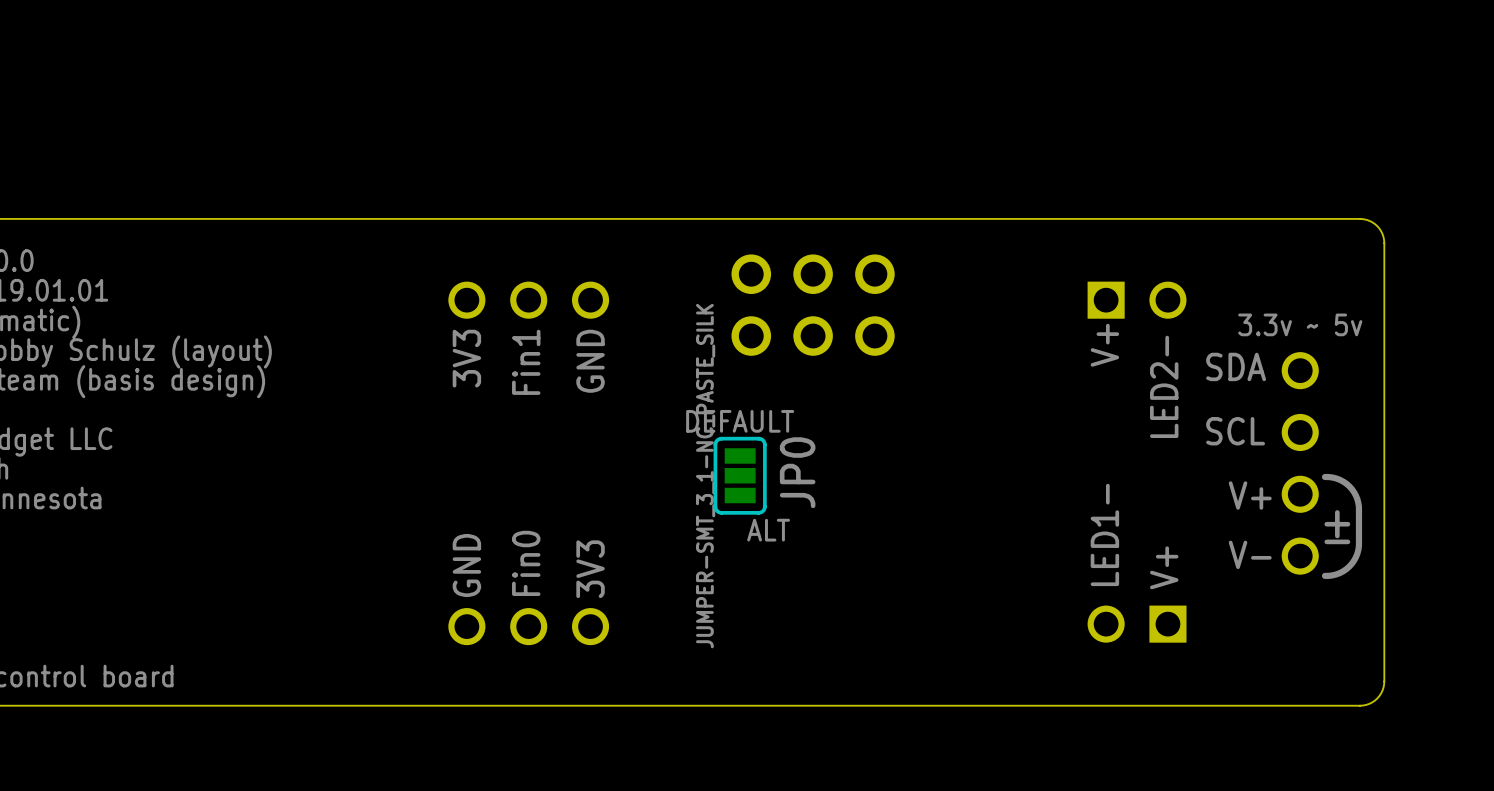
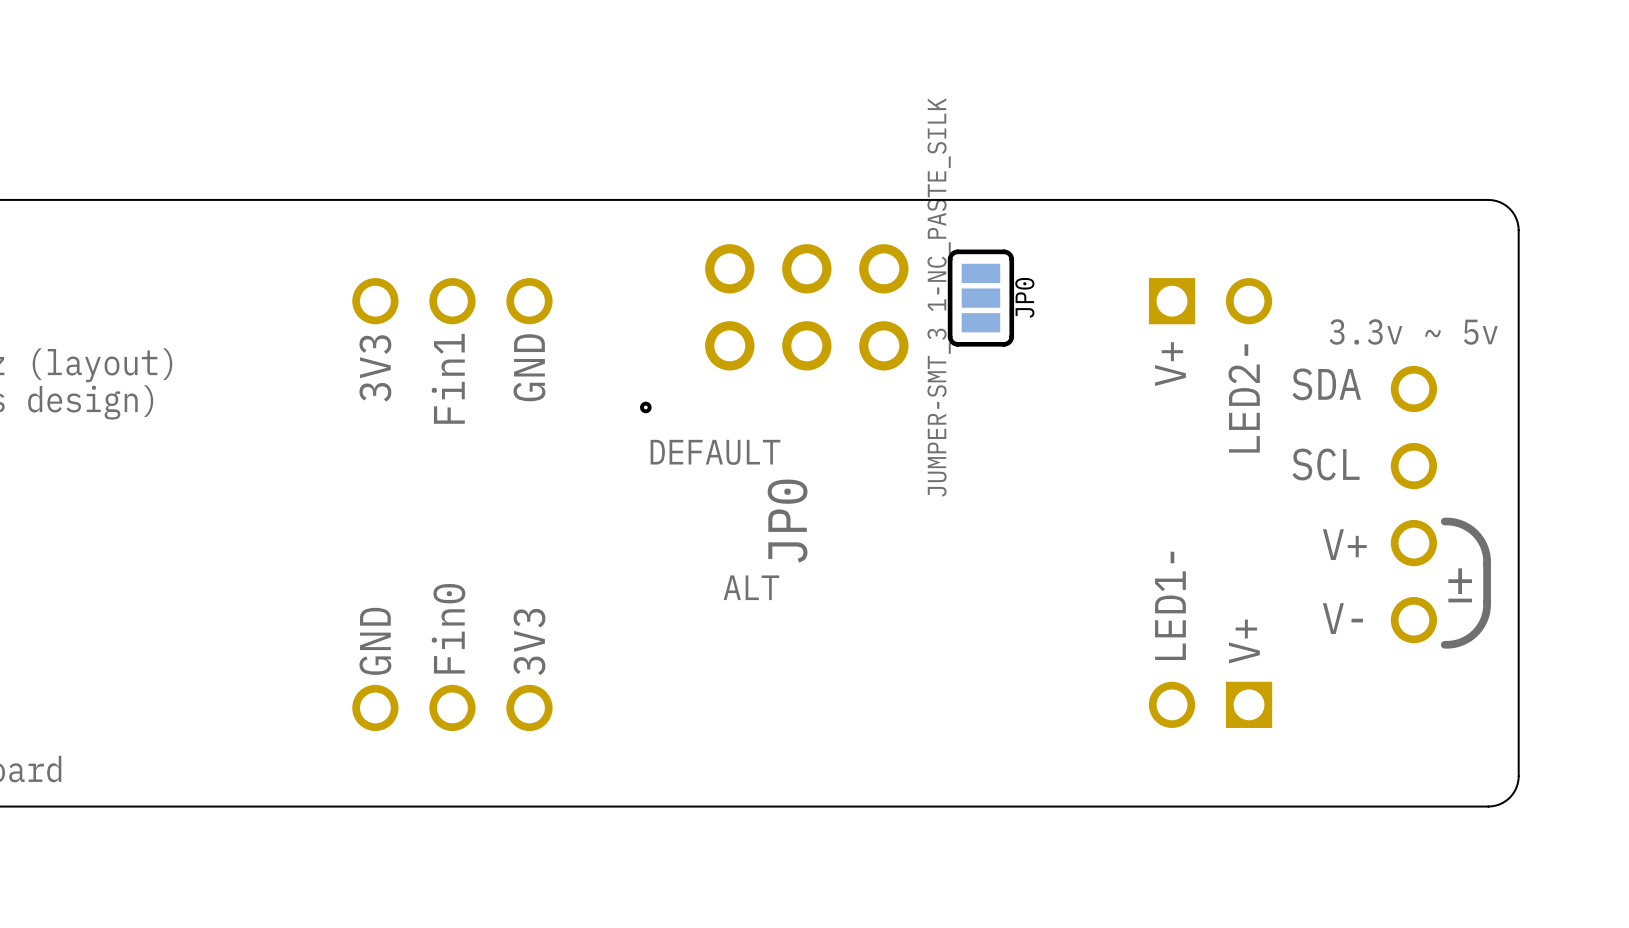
JP0: none -> JUMPER-SMT_3_1-NC_PASTE_SILK (980, 298)
part: none -> (645, 407)
part: JUMPER-SMT_3_1-NC_PASTE_SILK (740, 475) -> none

